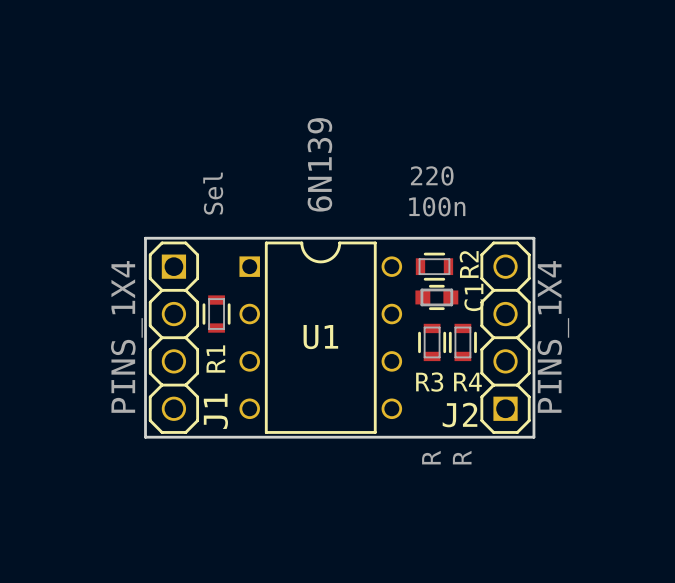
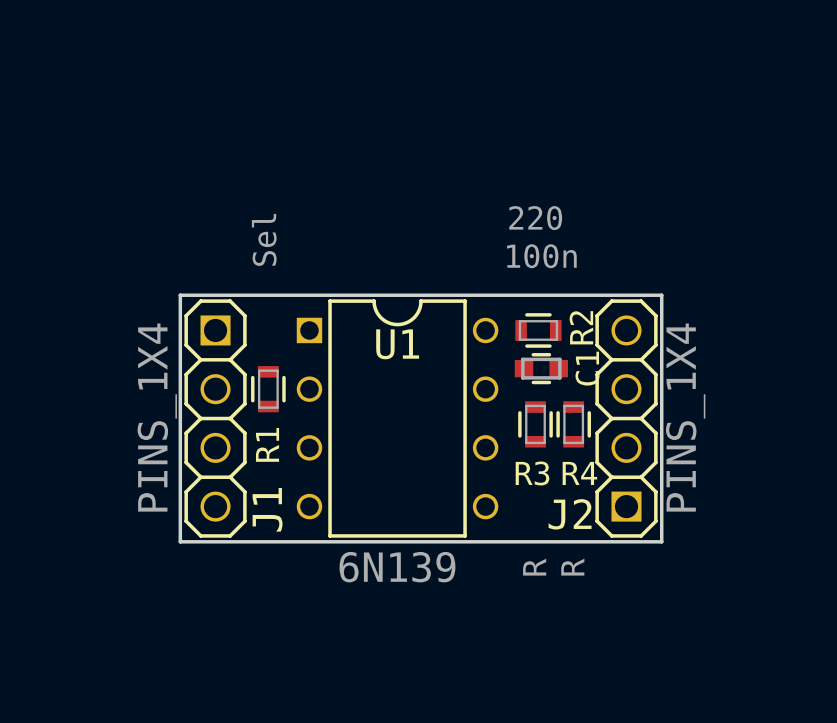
U1 value rotation: 0° (319, 164) -> 90° clockwise (397, 567)
U1 value position: 6N139 (319, 164) -> 6N139 (397, 567)
U1 name position: U1 (320, 337) -> U1 (397, 344)

